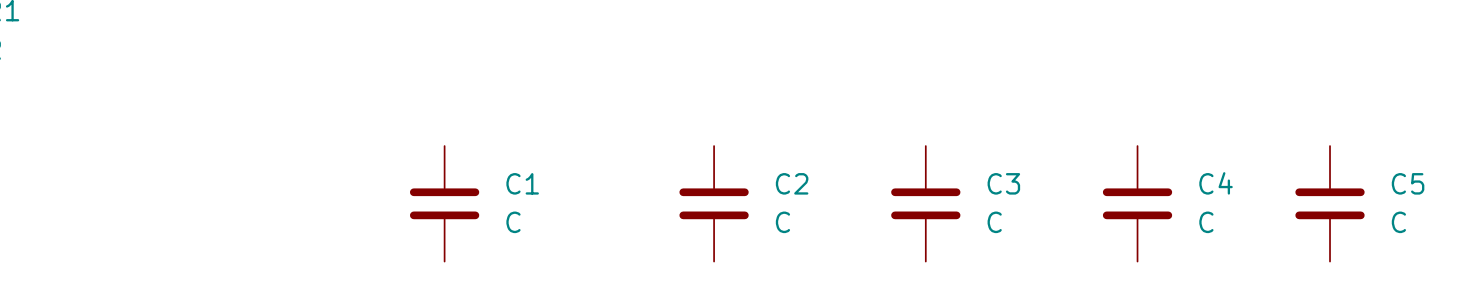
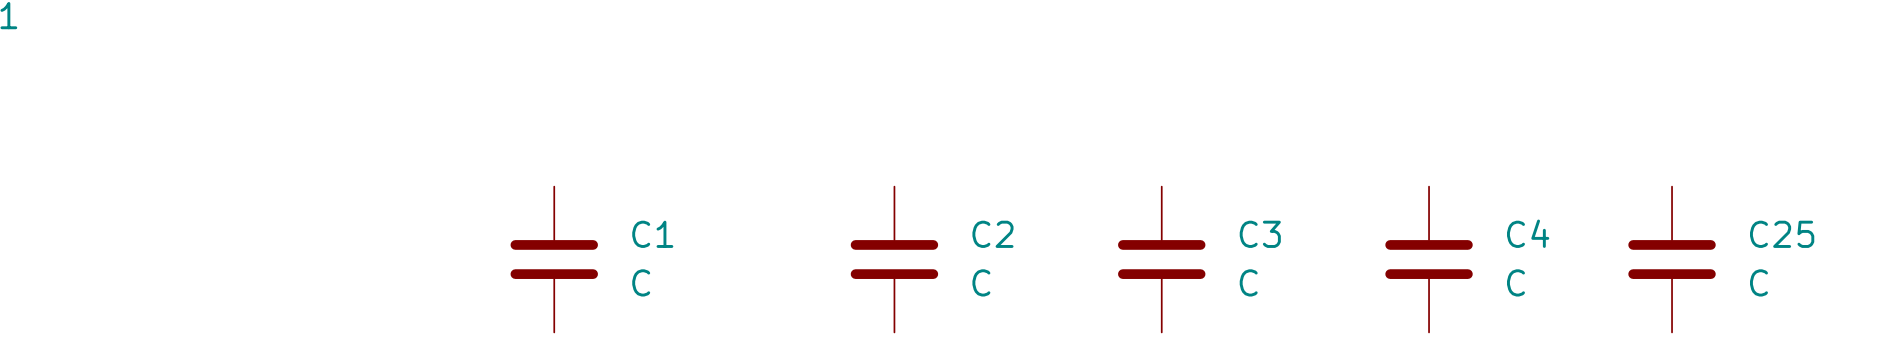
C5 name: C5 (1408, 183) -> C25 (1782, 234)

